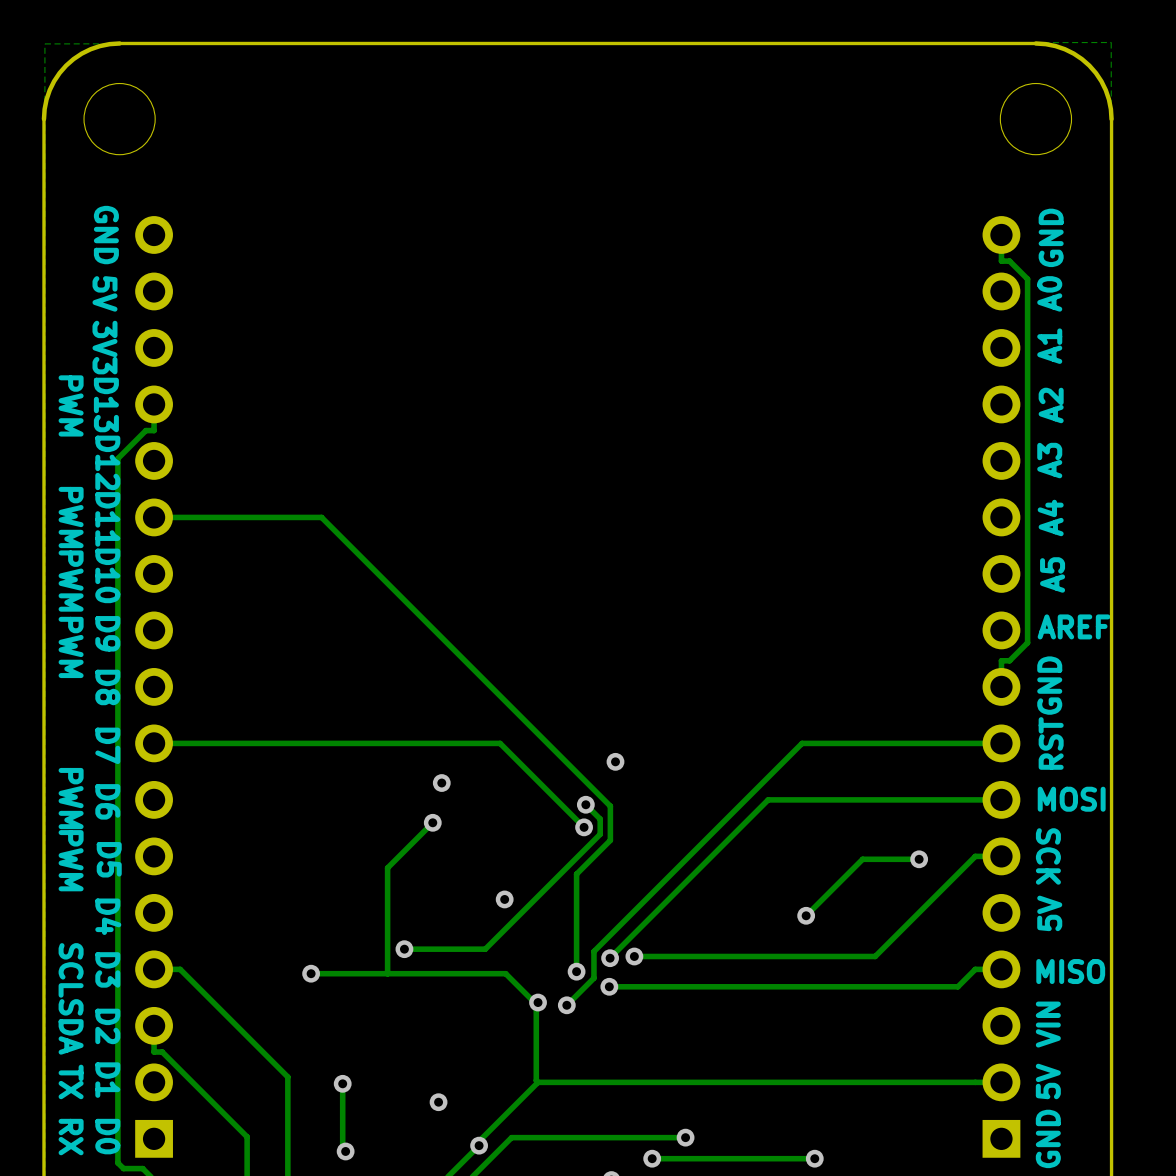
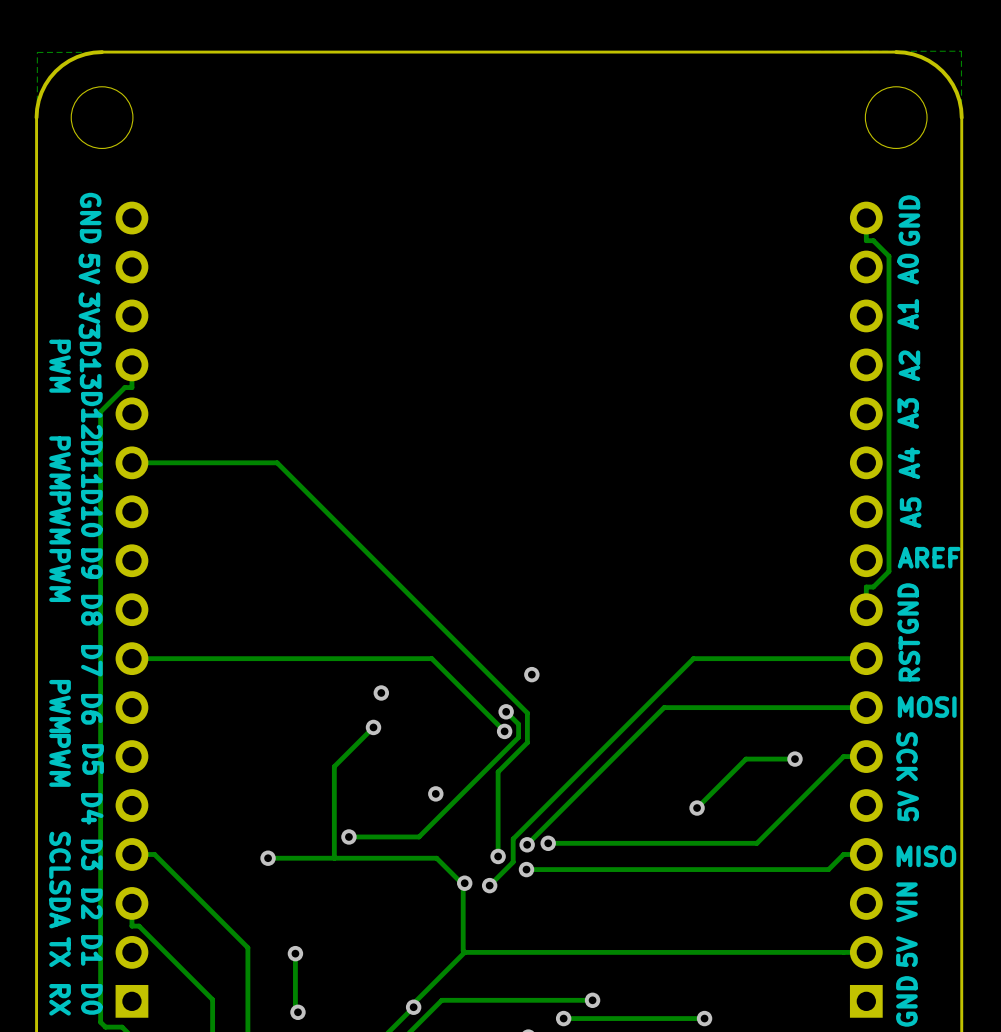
via: (438, 1102) -> none

